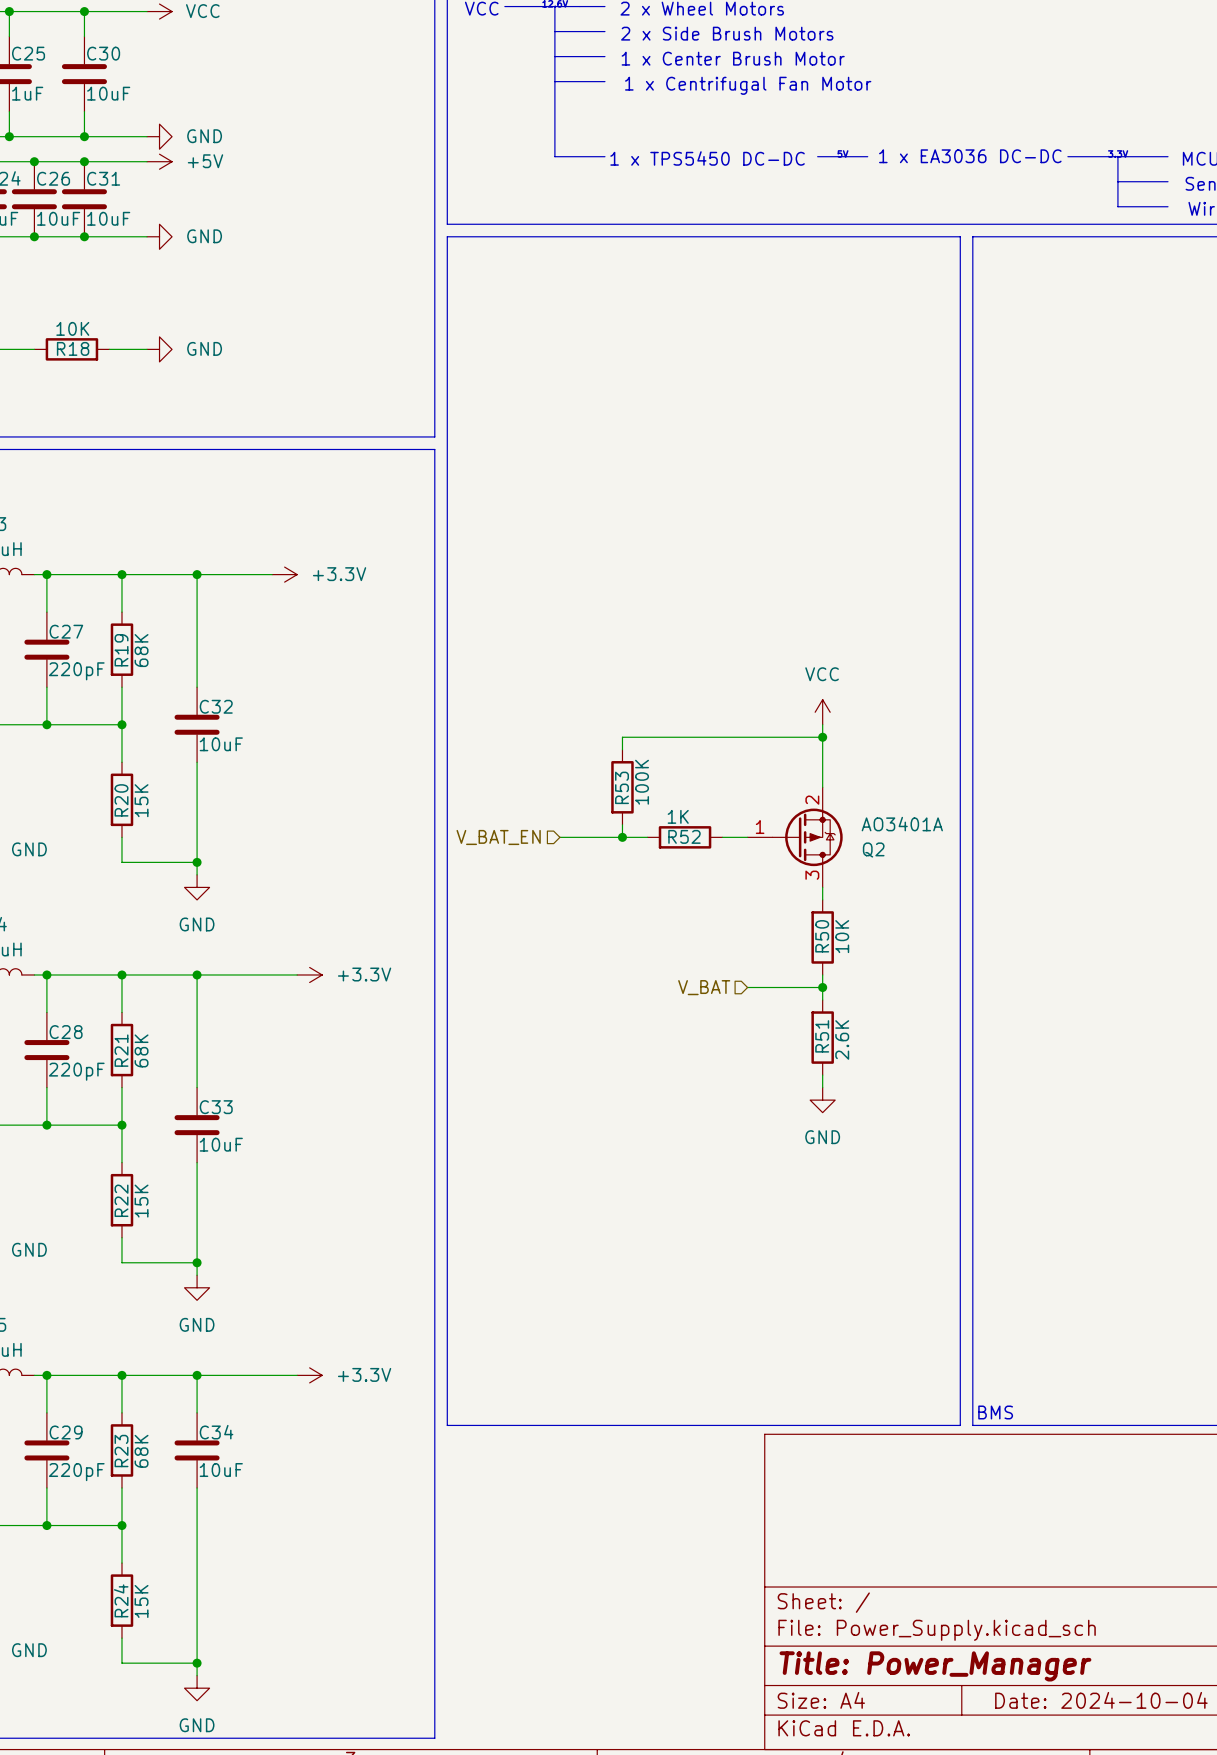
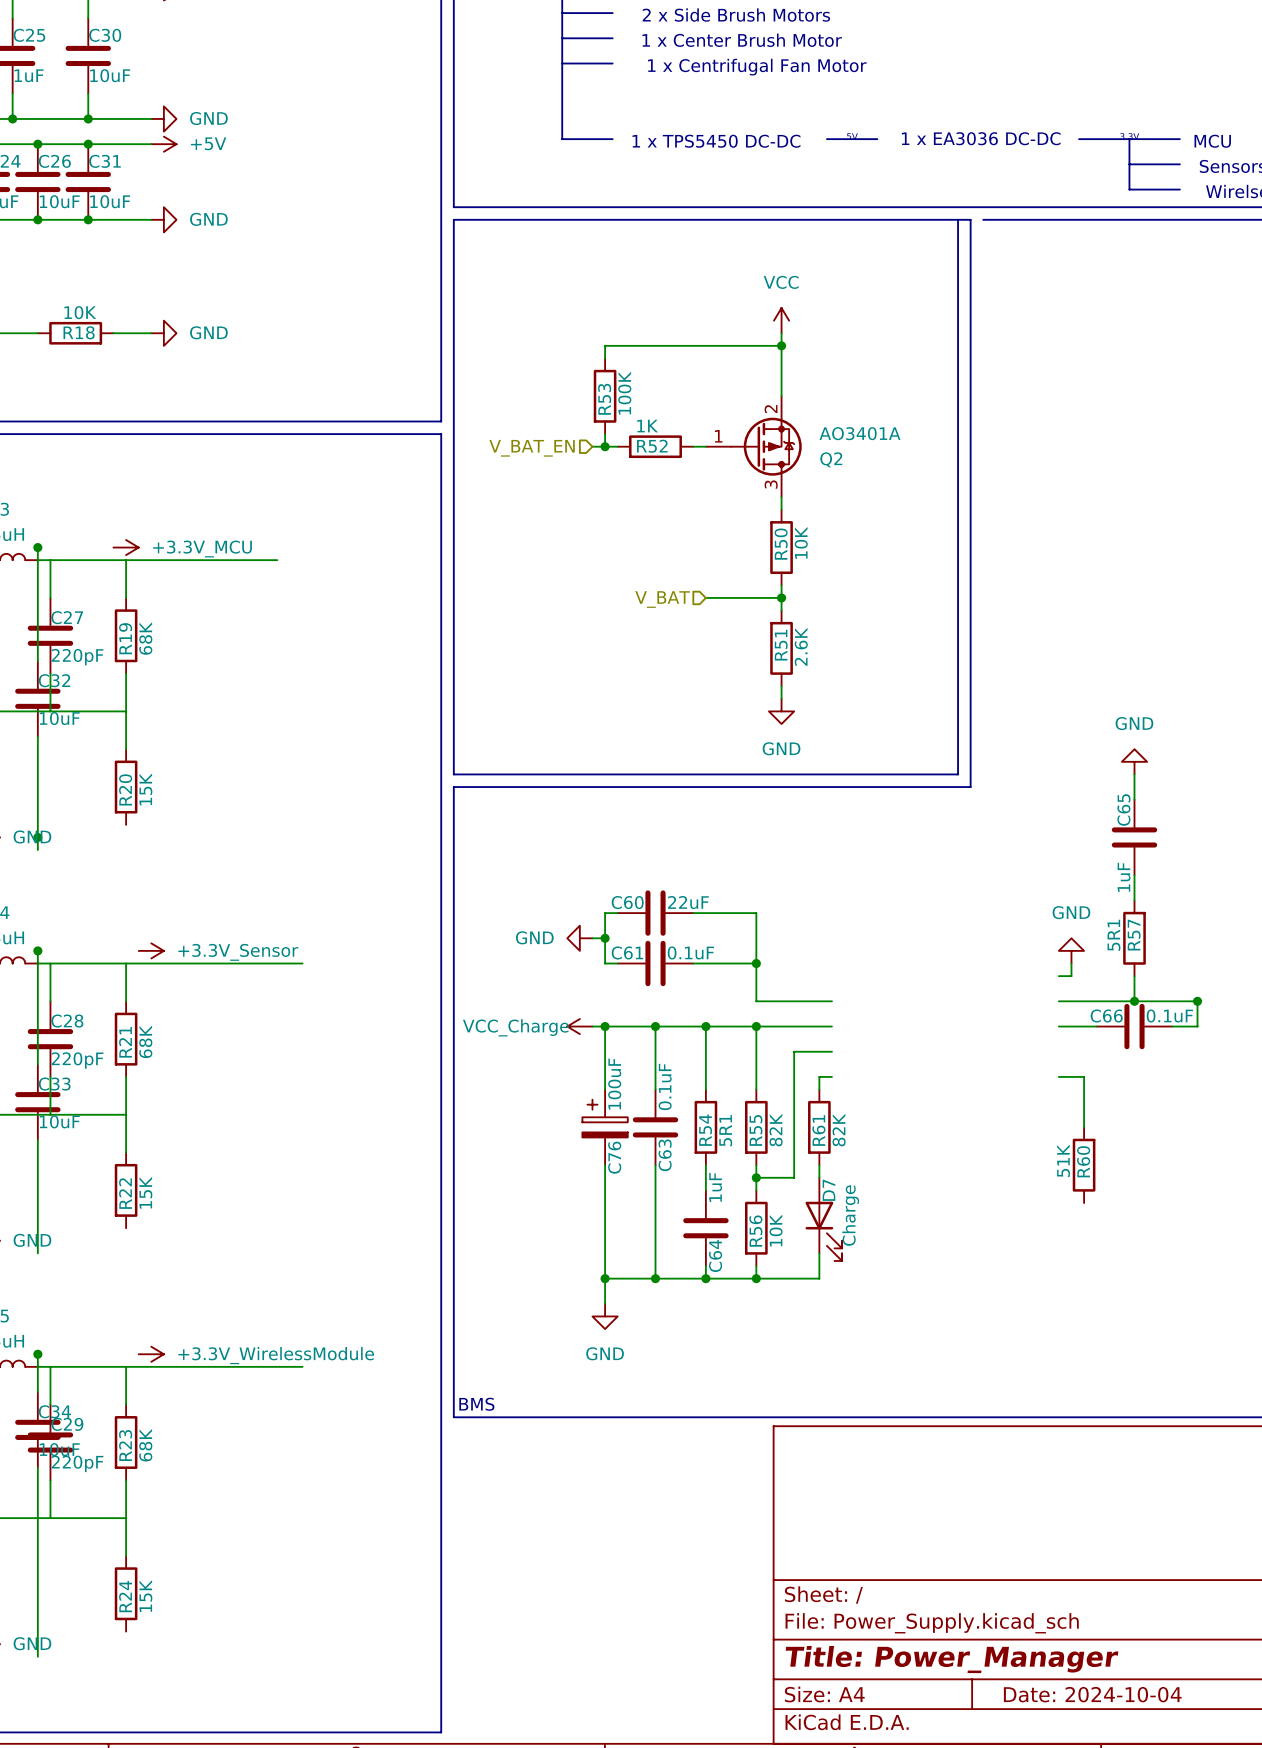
line: none -> (958, 219) (958, 774) (453, 774)
line: (972, 236) (972, 1425) -> none
power symbol: none -> VCC (781, 320)
wire: none -> (781, 333) (781, 396)
wire: none -> (781, 345) (605, 345) (605, 358)
junction: none -> (781, 345)
wire: none -> (605, 434) (605, 446)
wire: none -> (592, 446) (617, 446)
junction: none -> (605, 446)
wire: none -> (693, 446) (705, 446)
hierarchical label: none -> V_BAT_EN (532, 448)
wire: none -> (781, 497) (781, 509)
power symbol: none -> +3.3V_MCU (126, 547)
junction position: (46, 574) -> (37, 547)
junction: (121, 574) -> none
wire: (197, 574) (197, 687) -> (37, 547) (37, 660)
junction: (197, 574) -> none
power symbol: +3.3V (284, 574) -> none
wire: none -> (781, 585) (781, 610)
hierarchical label: none -> V_BAT (662, 599)
wire: none -> (705, 597) (781, 597)
junction: none -> (781, 597)
power symbol: VCC (822, 712) -> none
junction: (46, 724) -> none
junction: (121, 724) -> none
C32 position: (197, 724) -> (37, 698)
power symbol: none -> GND (781, 711)
wire: (822, 724) (822, 787) -> none
wire: (822, 737) (622, 737) (622, 749) -> none
junction: (822, 737) -> none
wire: (197, 762) (197, 874) -> (37, 736) (37, 850)
power symbol: none -> GND (1134, 761)
line: (447, 787) (447, 799) -> (970, 787) (453, 787)
R53 position: (622, 787) -> (605, 396)
wire: none -> (1134, 774) (1134, 799)
line: (960, 799) (960, 1425) -> (983, 1417) (970, 1417)
wire: (622, 824) (622, 837) -> none
wire: (121, 837) (121, 862) (197, 862) -> none
hierarchical label: V_BAT_EN (498, 837) -> none
wire: (559, 837) (647, 837) -> none
junction: (622, 837) -> none
R52 position: (685, 837) -> (655, 446)
wire: (722, 837) (747, 837) -> none
Q2 position: (795, 837) -> (753, 446)
junction: none -> (37, 837)
C65: none -> 1uF (1134, 837)
junction: (197, 862) -> none
power symbol: GND (197, 887) -> none
wire: (822, 887) (822, 899) -> (781, 686) (781, 698)
wire: none -> (1134, 875) (1134, 900)
wire: none -> (617, 913) (605, 913) (605, 963) (617, 963)
C60: none -> 22uF (655, 913)
wire: none -> (693, 913) (756, 913) (756, 1001) (831, 1001)
R50 position: (822, 937) -> (781, 547)
power symbol: none -> GND (579, 938)
wire: none -> (592, 938) (605, 938)
junction: none -> (605, 938)
R57: none -> 5R1 (1134, 938)
power symbol: none -> +3.3V_Sensor (151, 950)
power symbol: none -> GND (1071, 950)
junction position: (46, 974) -> (37, 950)
junction: (121, 974) -> none
wire: (197, 974) (197, 1087) -> (37, 950) (37, 1064)
junction: (197, 974) -> none
power symbol: +3.3V (309, 974) -> none
C61: none -> 0.1uF (655, 963)
wire: none -> (693, 963) (756, 963)
junction: none -> (756, 963)
wire: (822, 974) (822, 1000) -> (756, 1165) (756, 1190)
wire: none -> (1071, 963) (1071, 976) (1058, 976)
hierarchical label: V_BAT (704, 987) -> none
wire: (747, 987) (822, 987) -> none
junction: (822, 987) -> none
wire: none -> (1134, 976) (1134, 1001)
wire: none -> (1058, 1001) (1197, 1001) (1197, 1026) (1172, 1026)
junction: none -> (1134, 1001)
junction: none -> (1197, 1001)
power symbol: none -> VCC_Charge (579, 1026)
wire: none -> (592, 1026) (831, 1026)
wire: none -> (605, 1026) (605, 1089)
junction: none -> (605, 1026)
wire: none -> (655, 1026) (655, 1089)
junction: none -> (655, 1026)
wire: none -> (705, 1026) (705, 1089)
junction: none -> (705, 1026)
wire: none -> (756, 1026) (756, 1089)
junction: none -> (756, 1026)
R51 position: (822, 1037) -> (781, 648)
wire: none -> (1058, 1026) (1096, 1026)
C66: none -> 0.1uF (1134, 1026)
wire: none -> (831, 1051) (794, 1051) (794, 1177) (756, 1177)
wire: (822, 1075) (822, 1087) -> (819, 1089) (819, 1076) (831, 1076)
wire: none -> (1058, 1076) (1084, 1076) (1084, 1127)
power symbol: GND (822, 1100) -> none
junction: (46, 1125) -> none
junction: (121, 1125) -> none
C33 position: (197, 1125) -> (37, 1102)
C76: none -> 100uF (605, 1127)
C63: none -> 0.1uF (655, 1127)
R54: none -> 5R1 (705, 1127)
R55: none -> 82K (756, 1127)
R61: none -> 82K (819, 1127)
wire: (197, 1162) (197, 1275) -> (37, 1139) (37, 1253)
wire: none -> (605, 1165) (605, 1303)
wire: none -> (655, 1165) (655, 1278)
wire: none -> (705, 1165) (705, 1190)
wire: none -> (819, 1165) (819, 1177)
R60: none -> 51K (1084, 1165)
junction: none -> (756, 1177)
D7: none -> Charge (823, 1219)
wire: (121, 1237) (121, 1262) (197, 1262) -> none
C64: none -> 1uF (705, 1228)
R56: none -> 10K (756, 1228)
junction: (197, 1262) -> none
wire: none -> (819, 1253) (819, 1278) (605, 1278)
wire: none -> (705, 1266) (705, 1278)
wire: none -> (756, 1266) (756, 1278)
power symbol: GND (197, 1287) -> none
junction: none -> (605, 1278)
junction: none -> (655, 1278)
junction: none -> (705, 1278)
junction: none -> (756, 1278)
power symbol: none -> GND (605, 1316)
power symbol: none -> +3.3V_WirelessModule (151, 1354)
junction position: (46, 1375) -> (37, 1354)
junction: (121, 1375) -> none
wire: (197, 1375) (197, 1412) -> (37, 1354) (37, 1392)
junction: (197, 1375) -> none
power symbol: +3.3V (309, 1375) -> none
text: none -> BMS (476, 1404)
text: BMS (995, 1412) -> none
C34 position: (197, 1450) -> (37, 1429)
wire: (197, 1487) (197, 1675) -> (37, 1467) (37, 1656)
junction: (46, 1525) -> none
junction: (121, 1525) -> none
wire: (121, 1638) (121, 1663) (197, 1663) -> none
junction: (197, 1663) -> none
power symbol: GND (197, 1688) -> none

